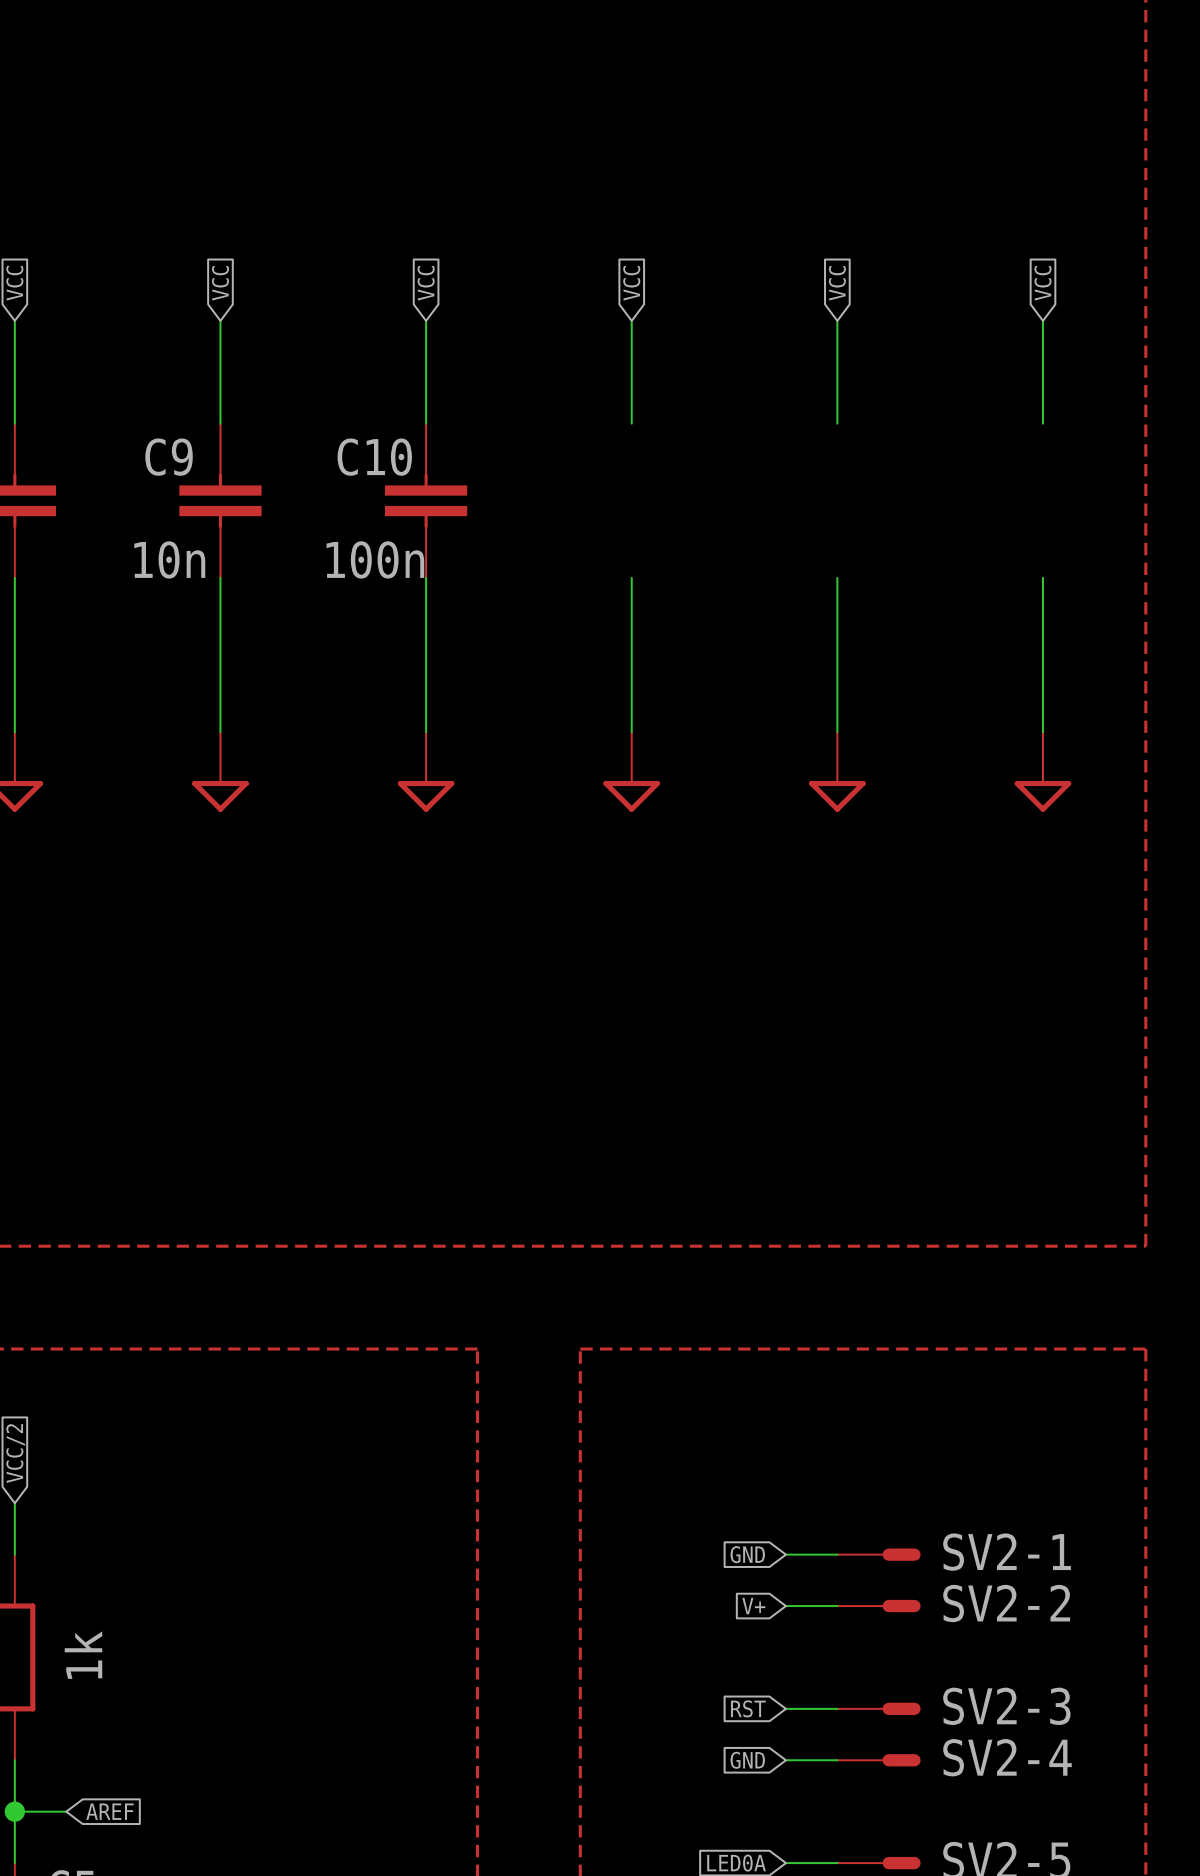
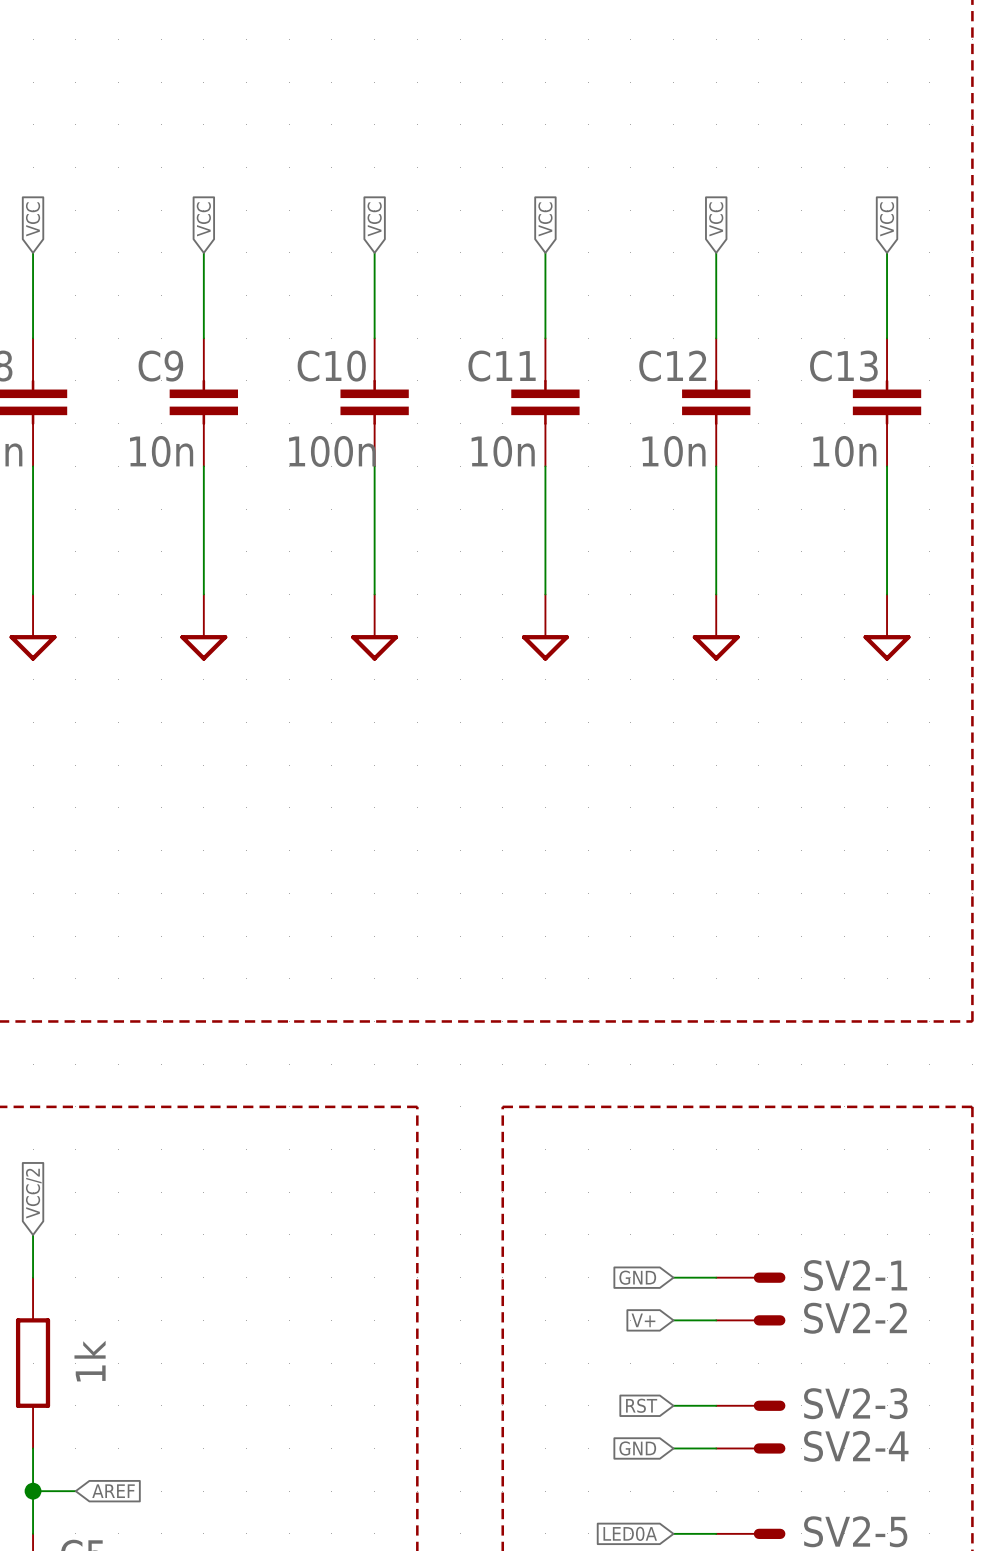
C11: none -> 10n (545, 402)
C12: none -> 10n (716, 402)
C13: none -> 10n (887, 402)

